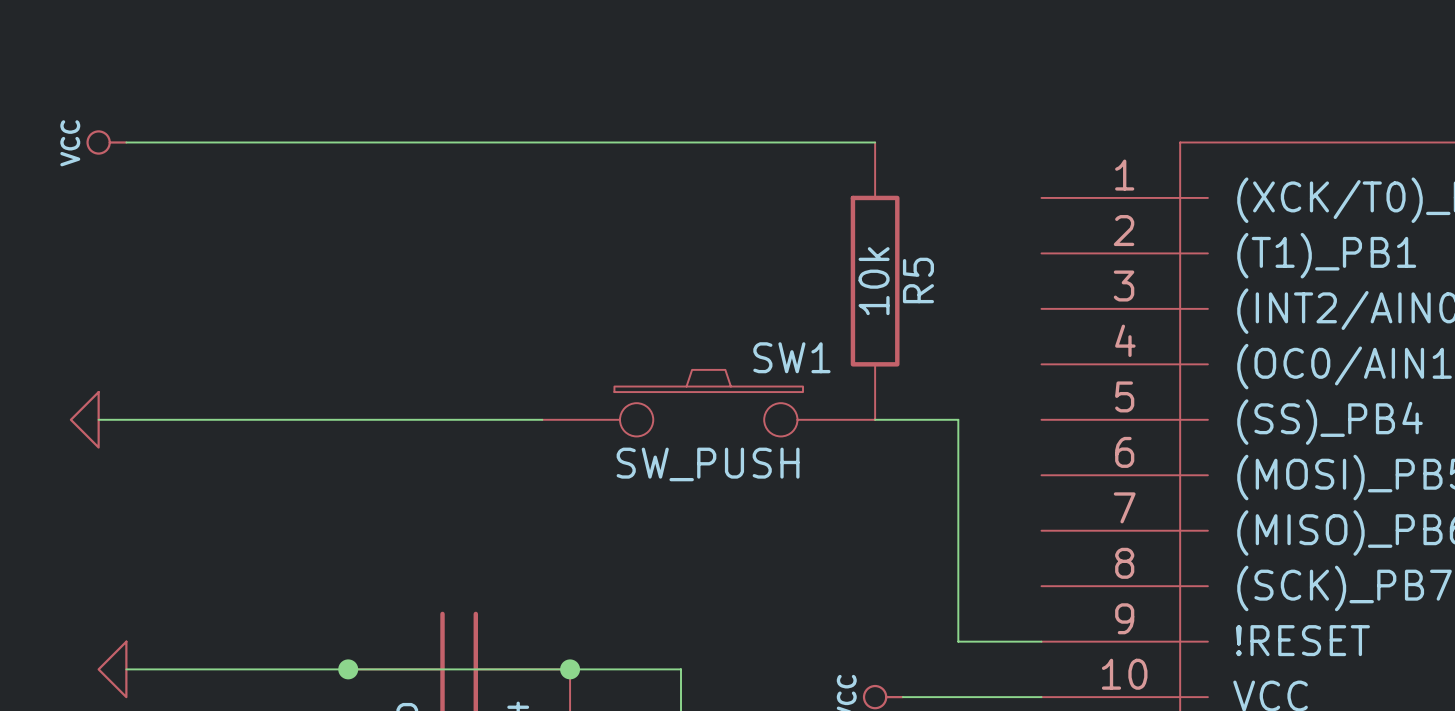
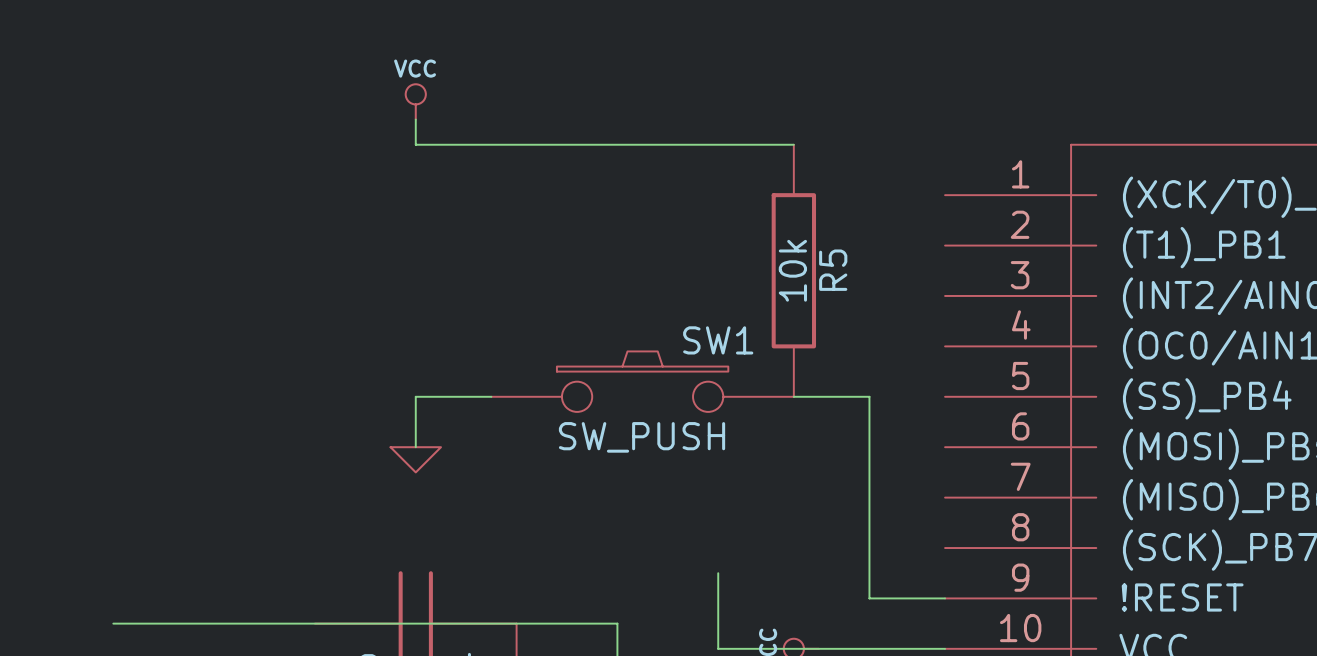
power symbol rotation: 0° (106, 142) -> 90° clockwise (415, 101)
power symbol position: VCC (106, 142) -> VCC (415, 101)
wire: (126, 142) (459, 142) -> (415, 119) (415, 144)
power symbol: (84, 419) -> none
wire: (98, 419) (459, 419) -> (415, 447) (415, 396)
power symbol: none -> (415, 459)
wire: none -> (718, 573) (718, 648) (819, 648)
power symbol: (112, 669) -> none
junction: (348, 669) -> none
junction: (570, 669) -> none

